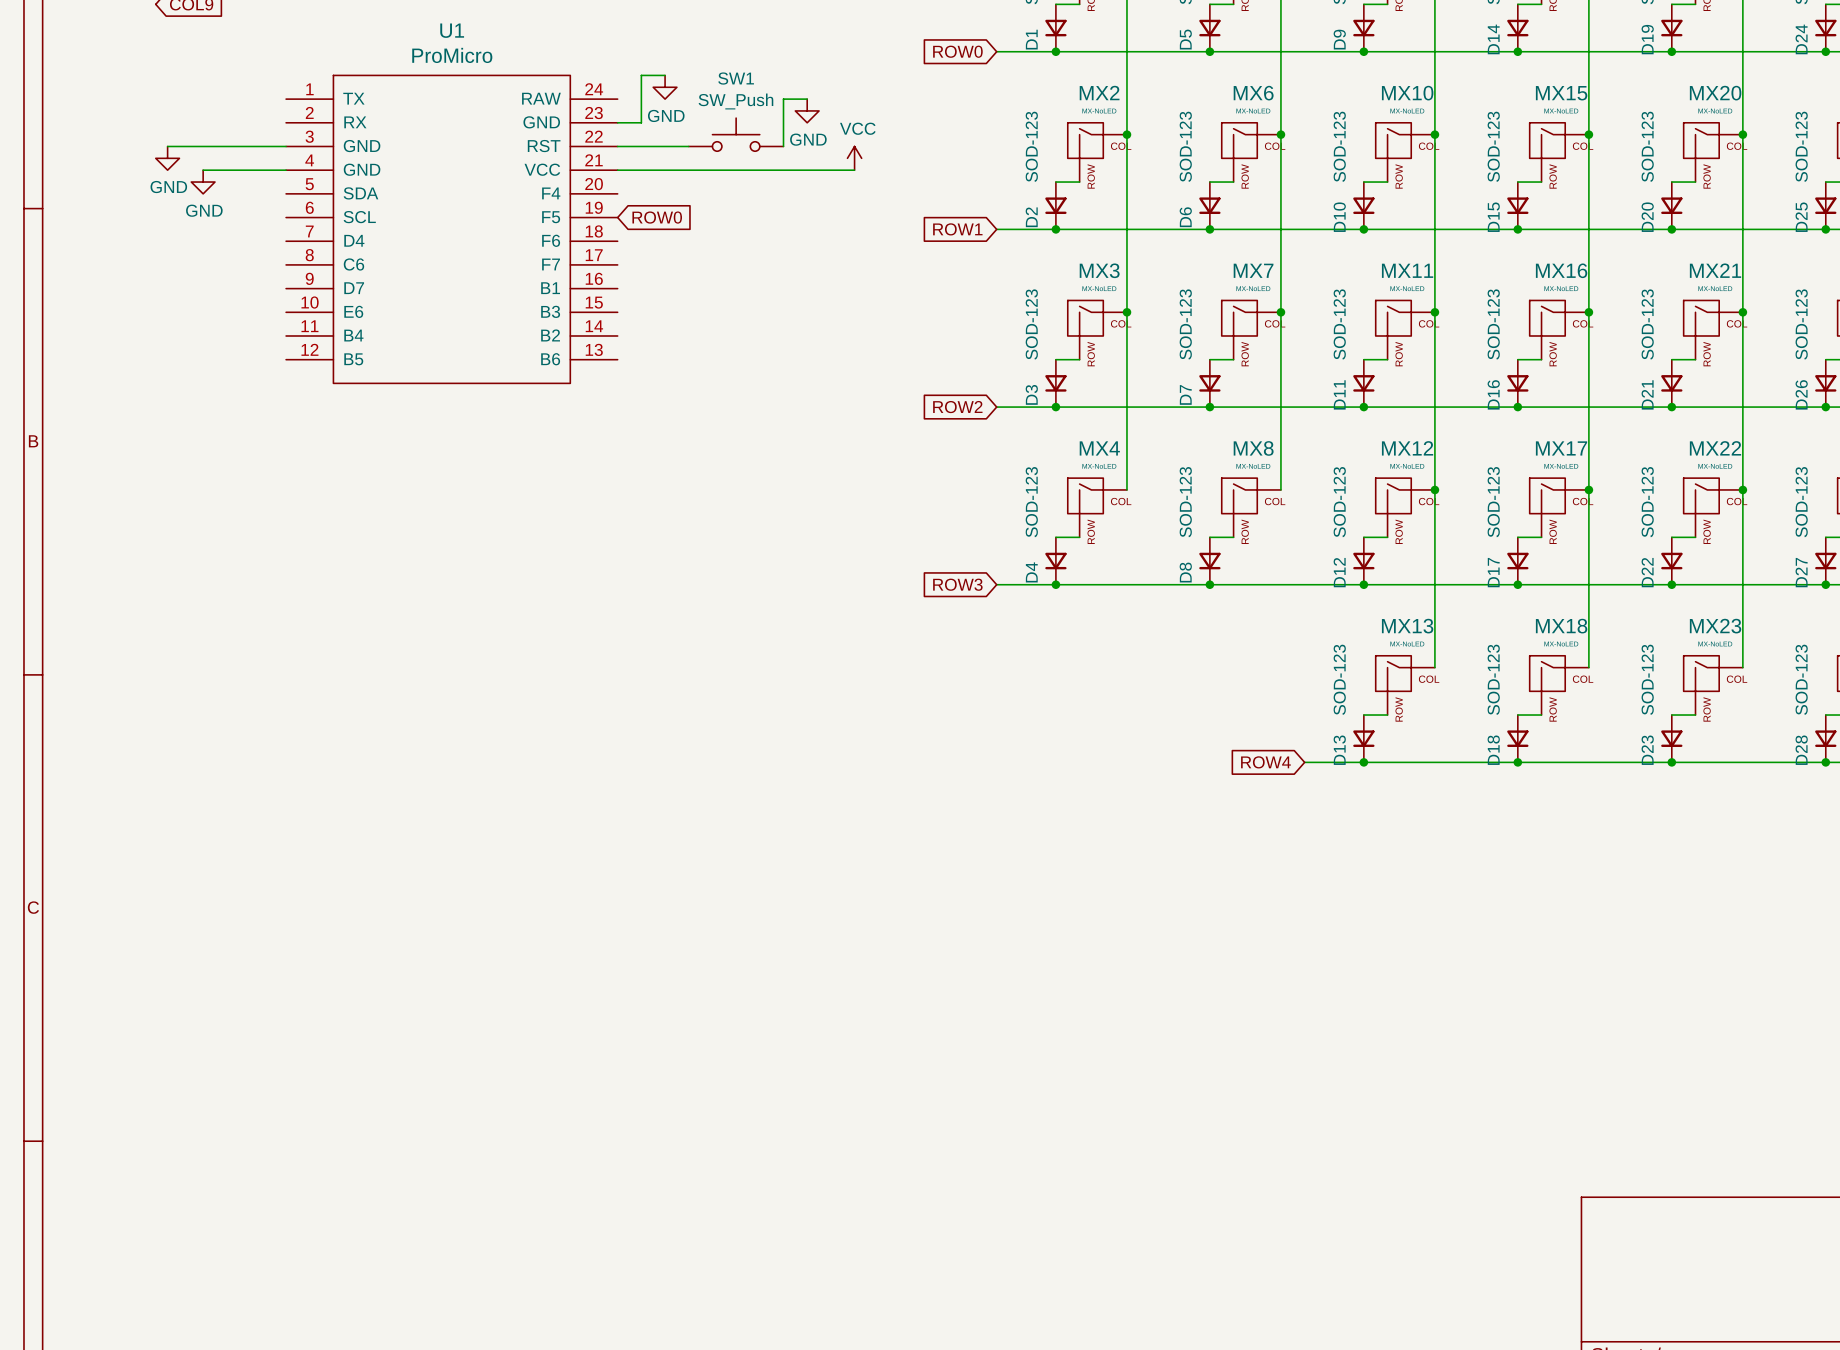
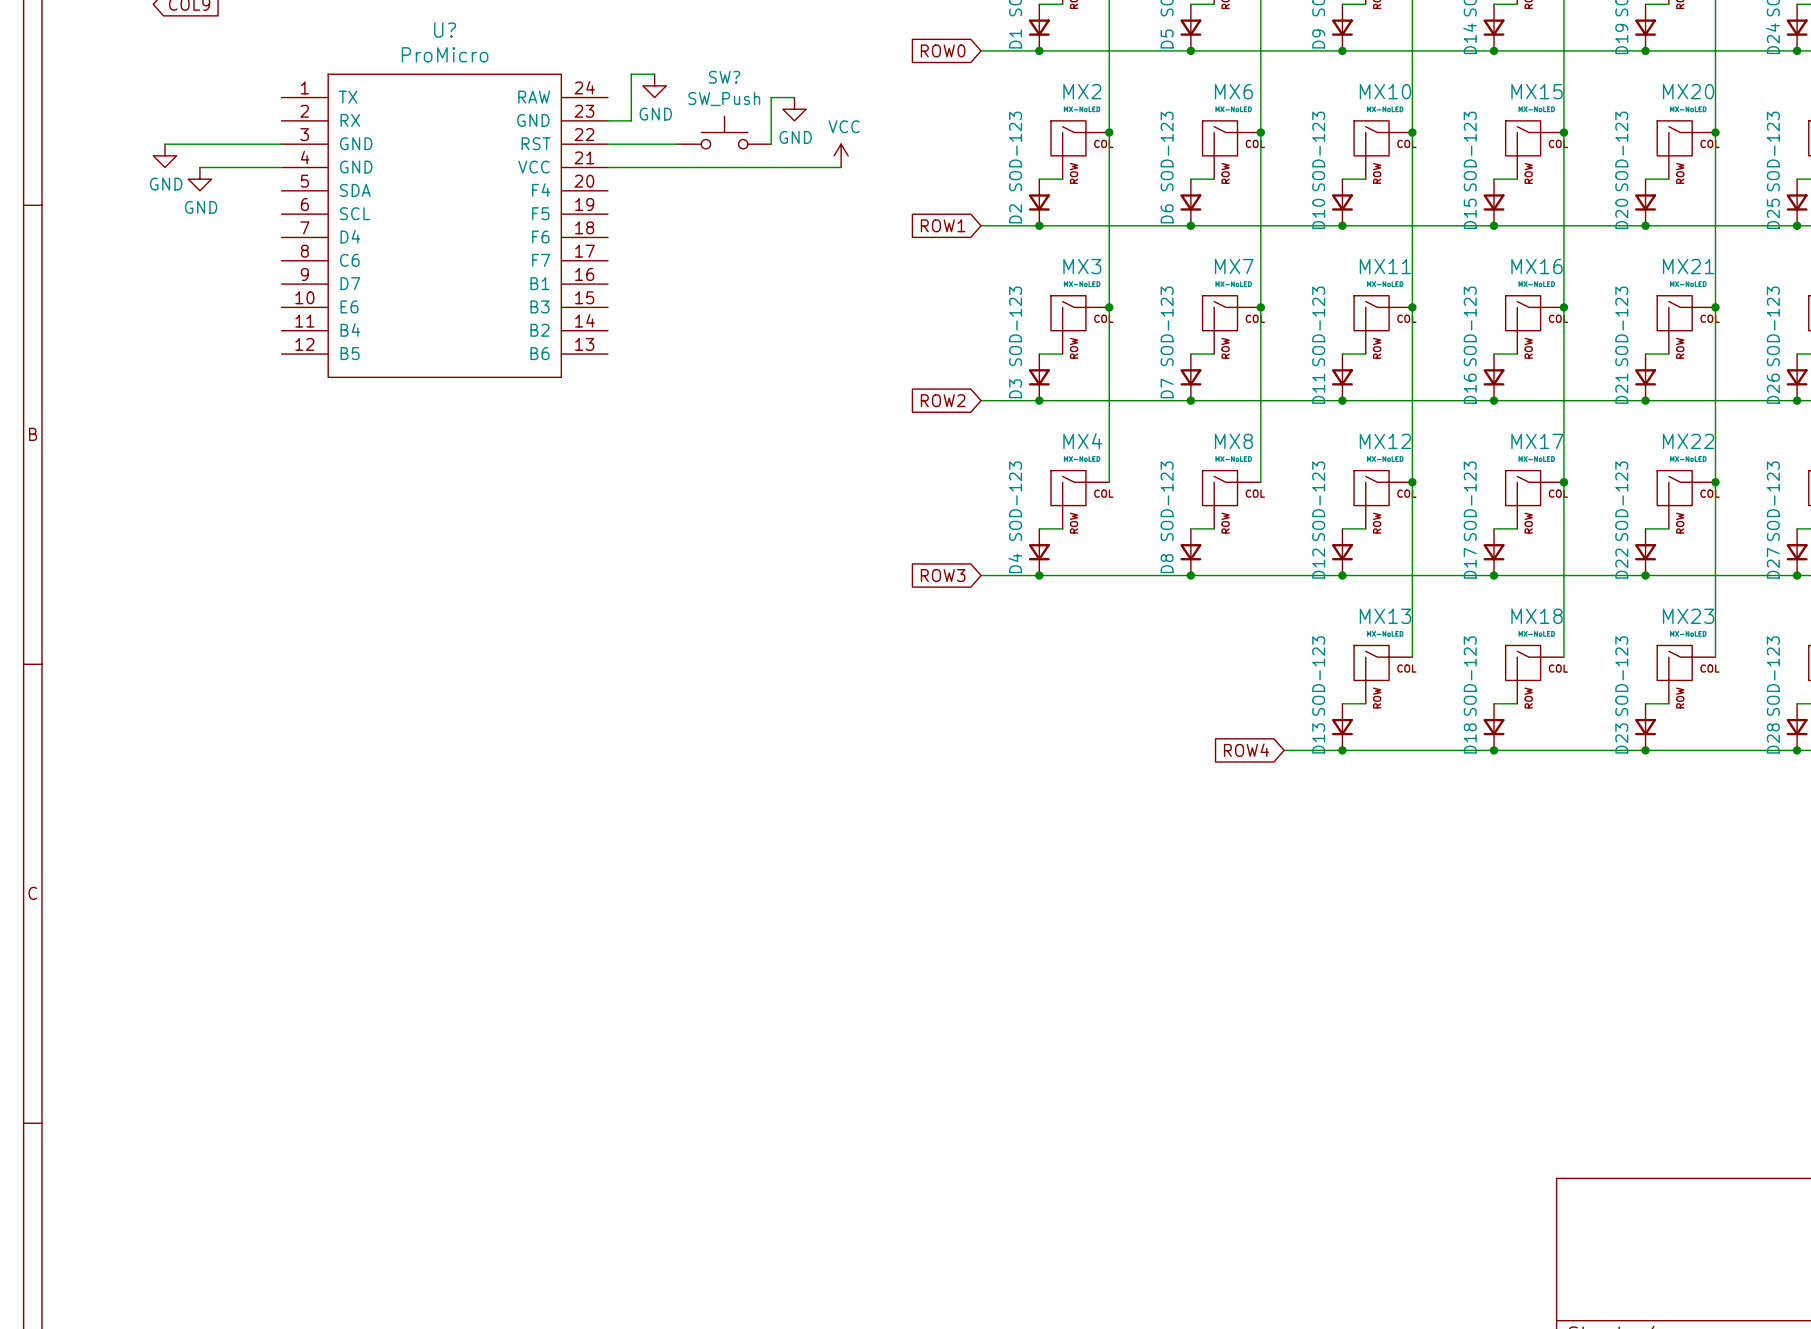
U1 name: U1 (452, 30) -> U? (445, 30)
SW1 name: SW1 (736, 78) -> SW? (724, 77)
global label: ROW0 (657, 217) -> none

